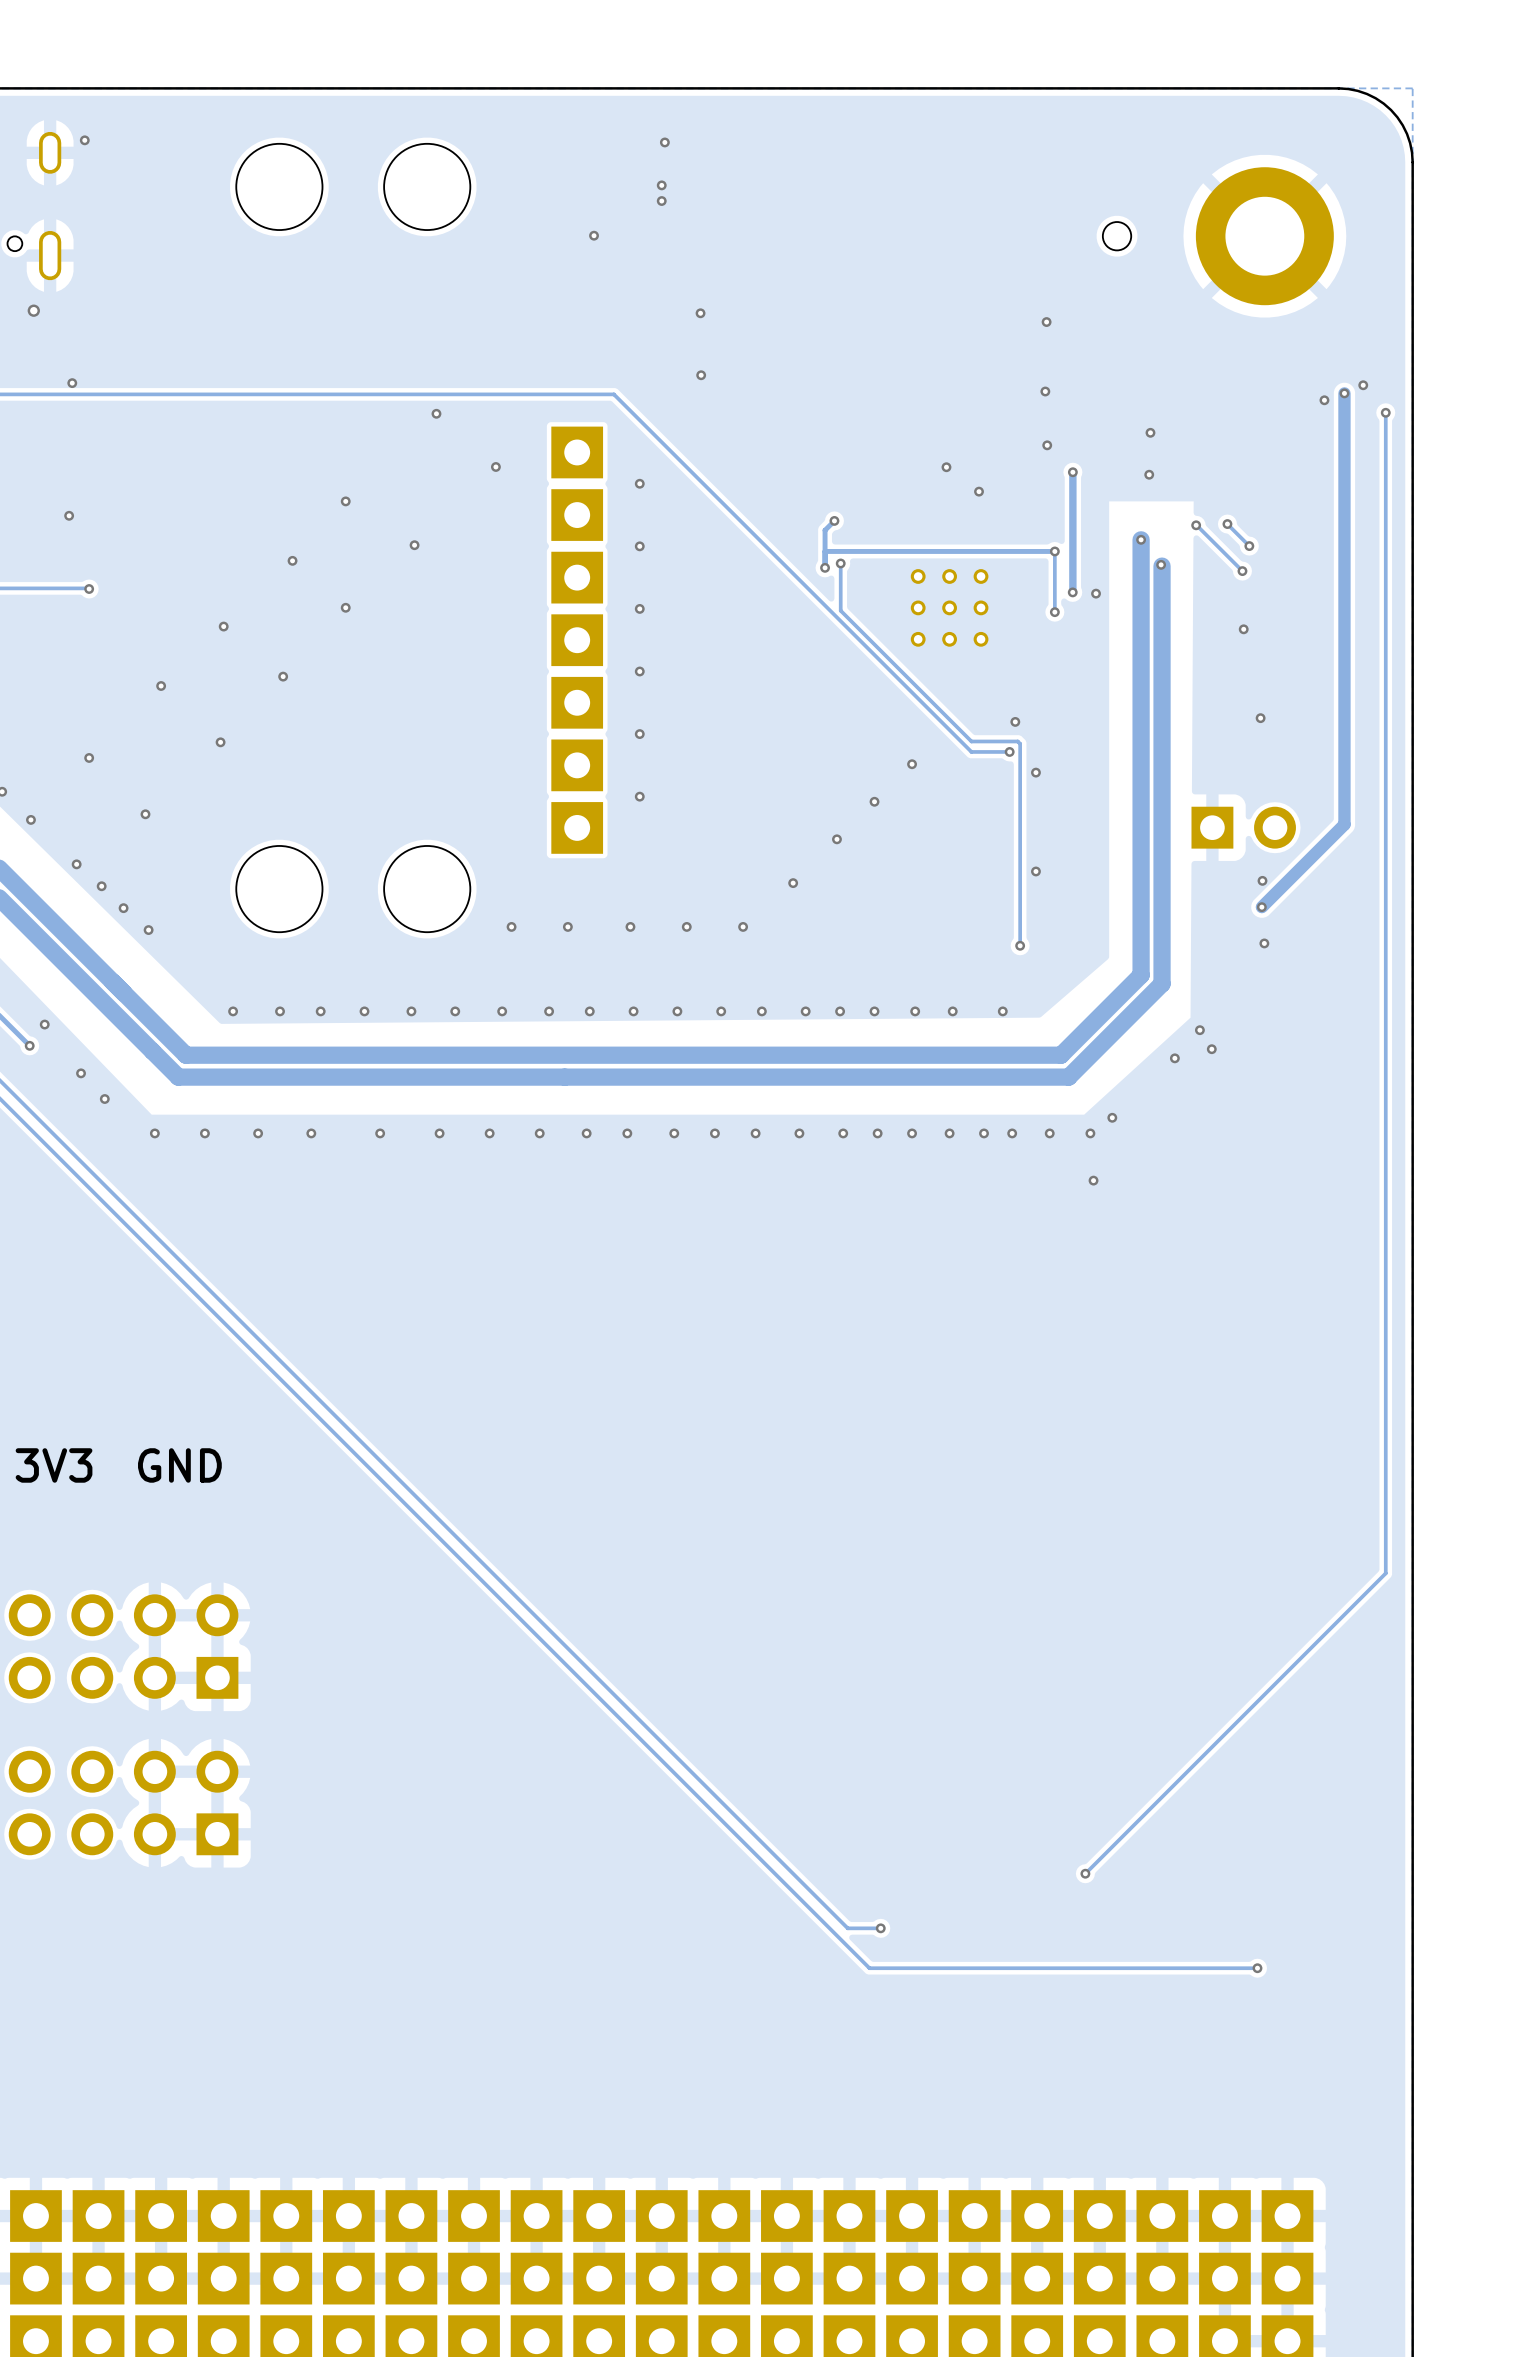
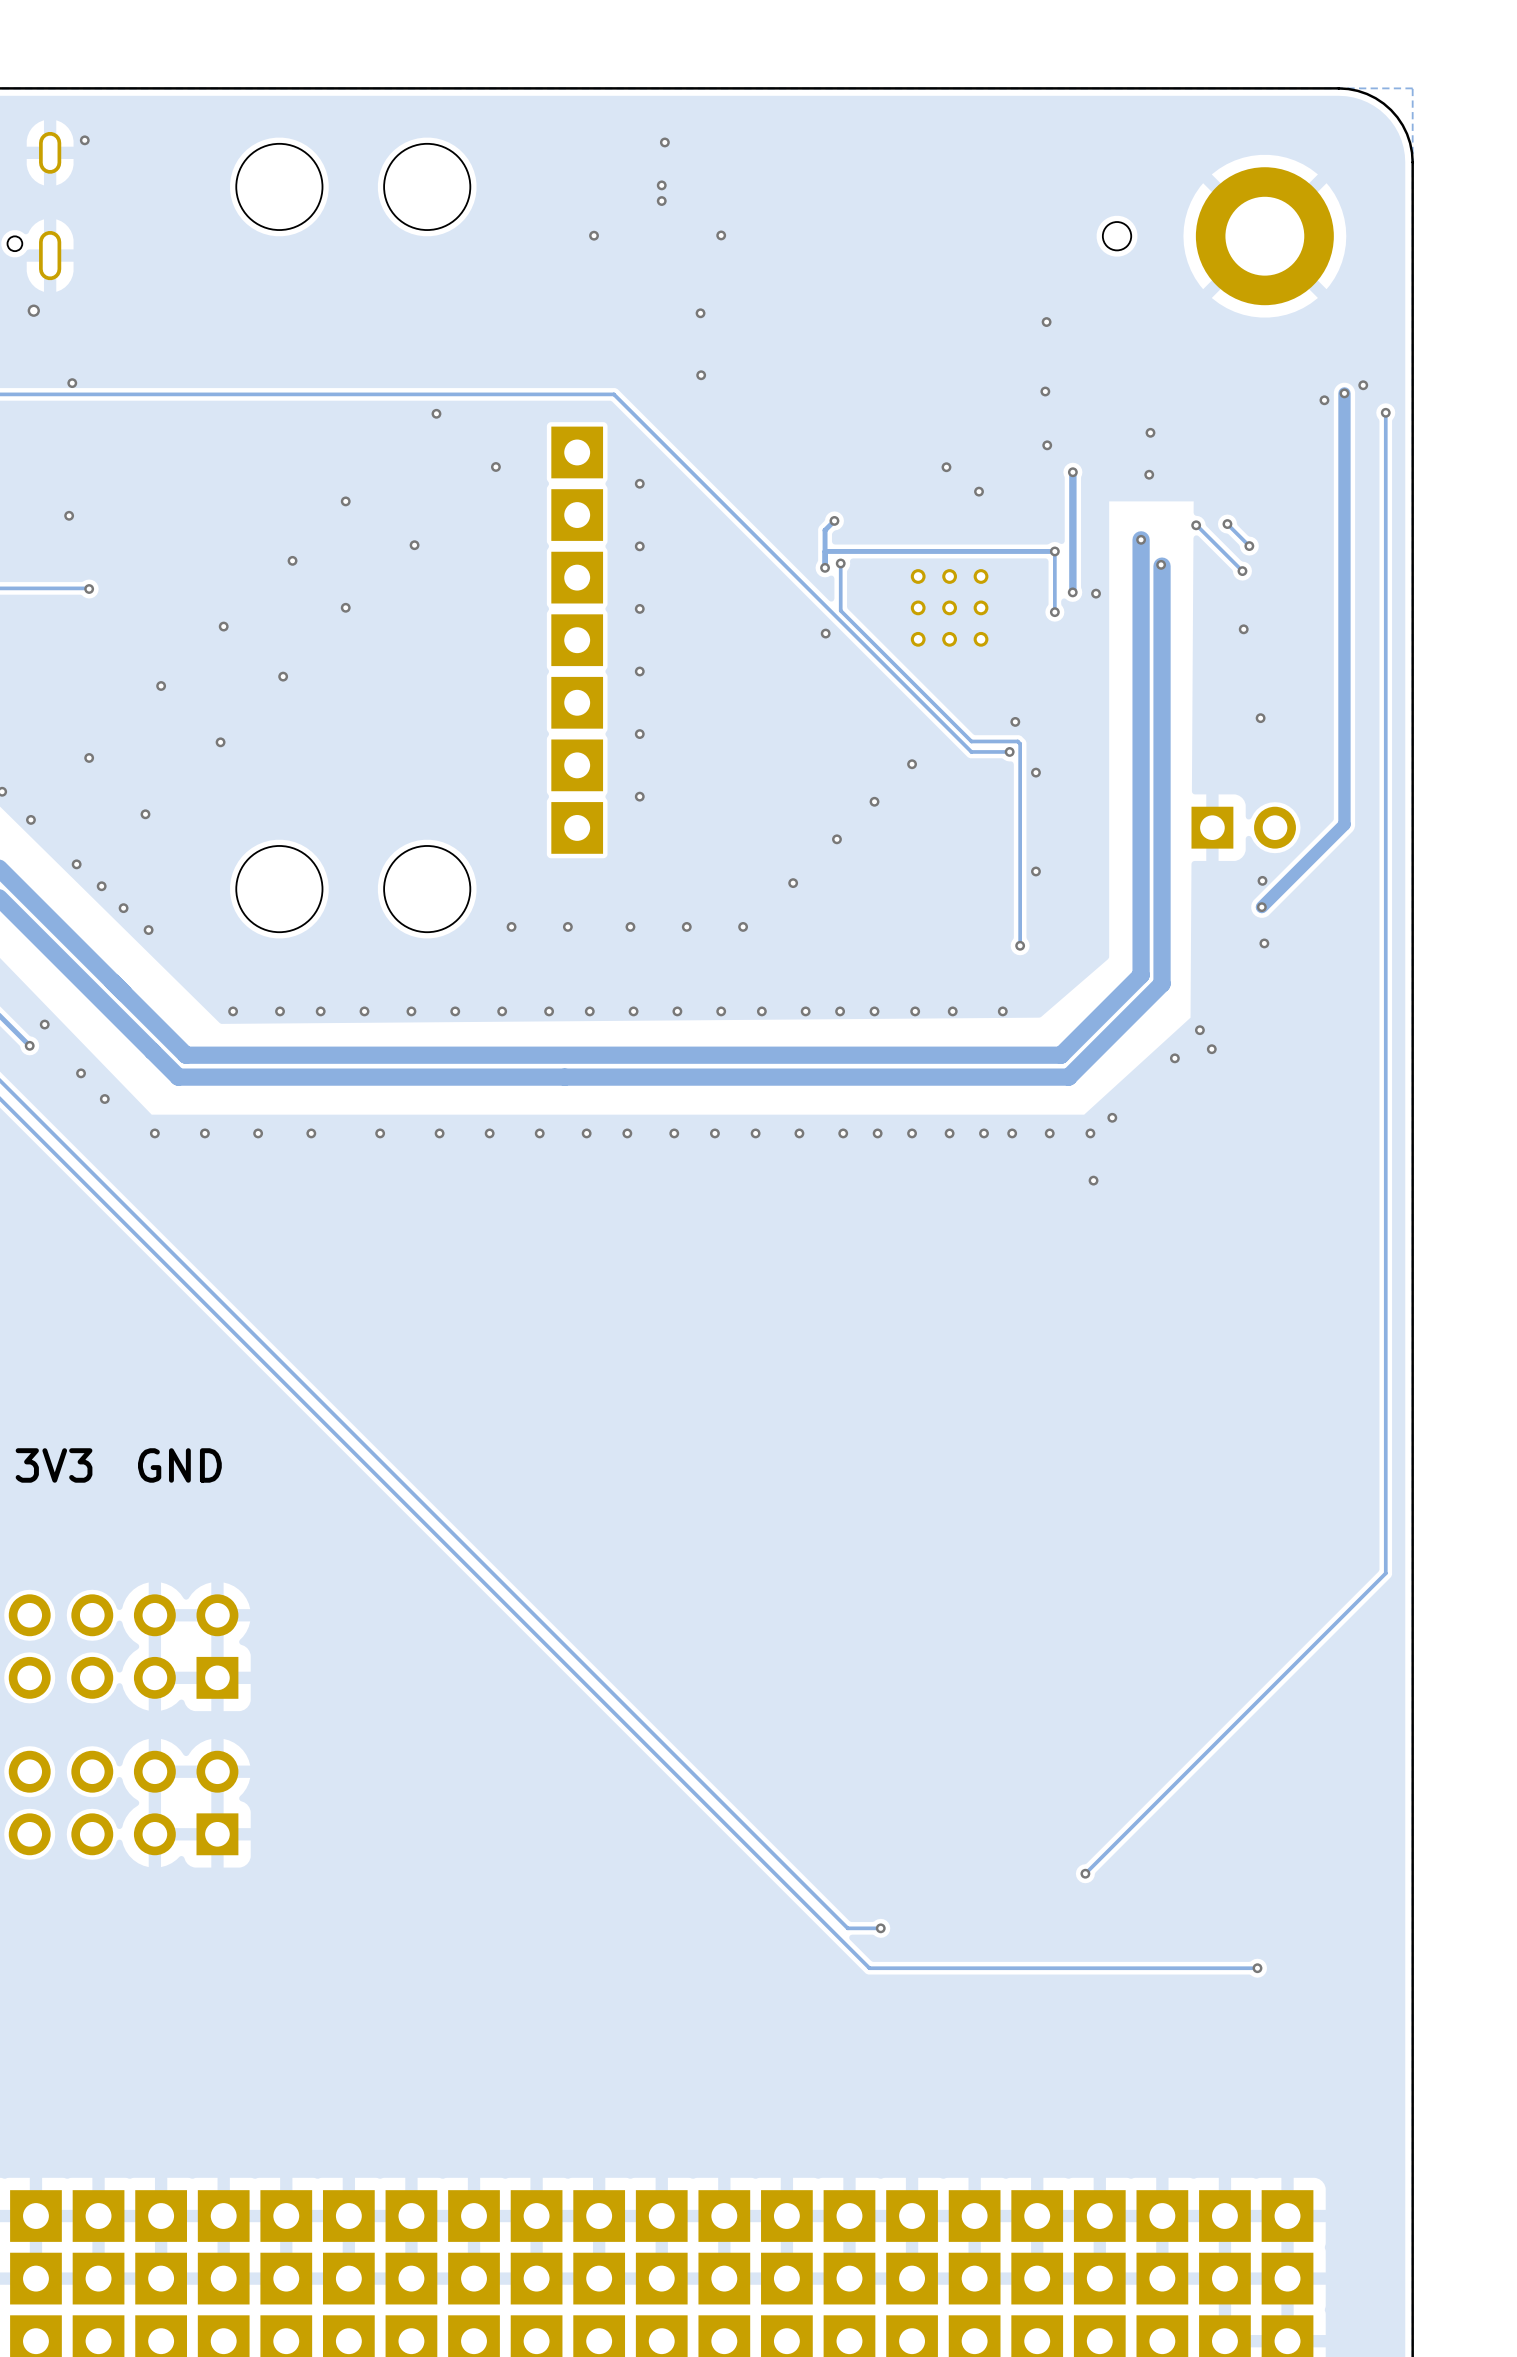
via: none -> (721, 235)
via: none -> (825, 633)

